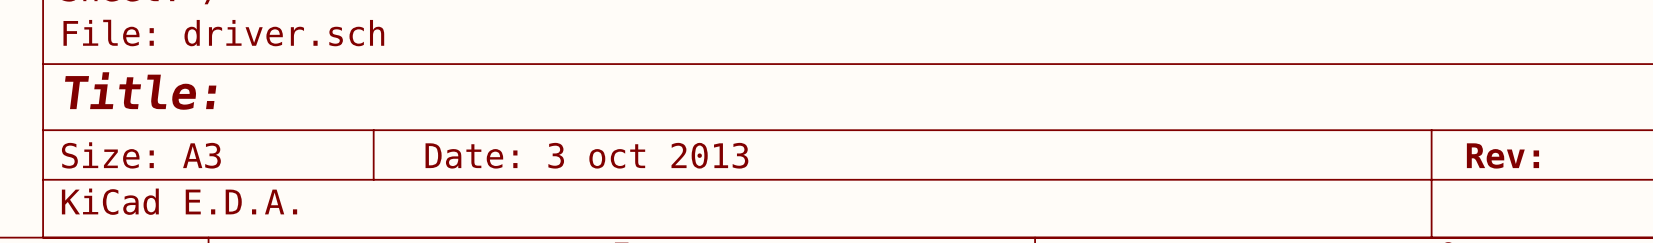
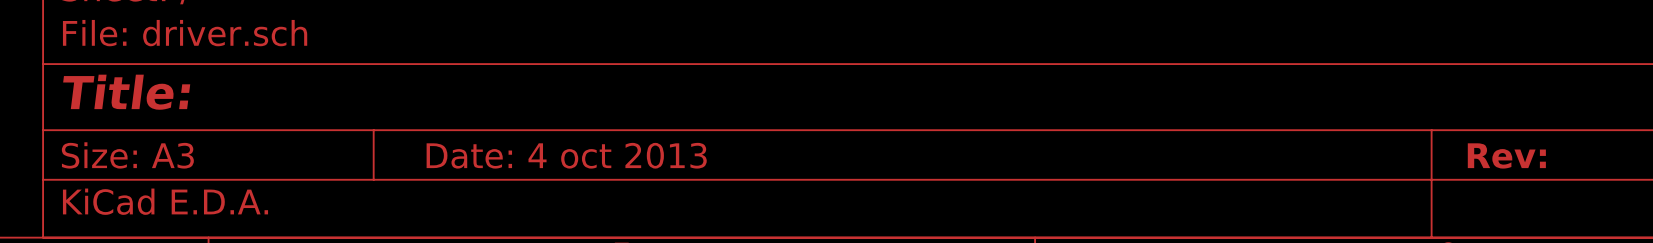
title block: Date: 3 oct 2013 (586, 155) -> Date: 4 oct 2013 (566, 155)

